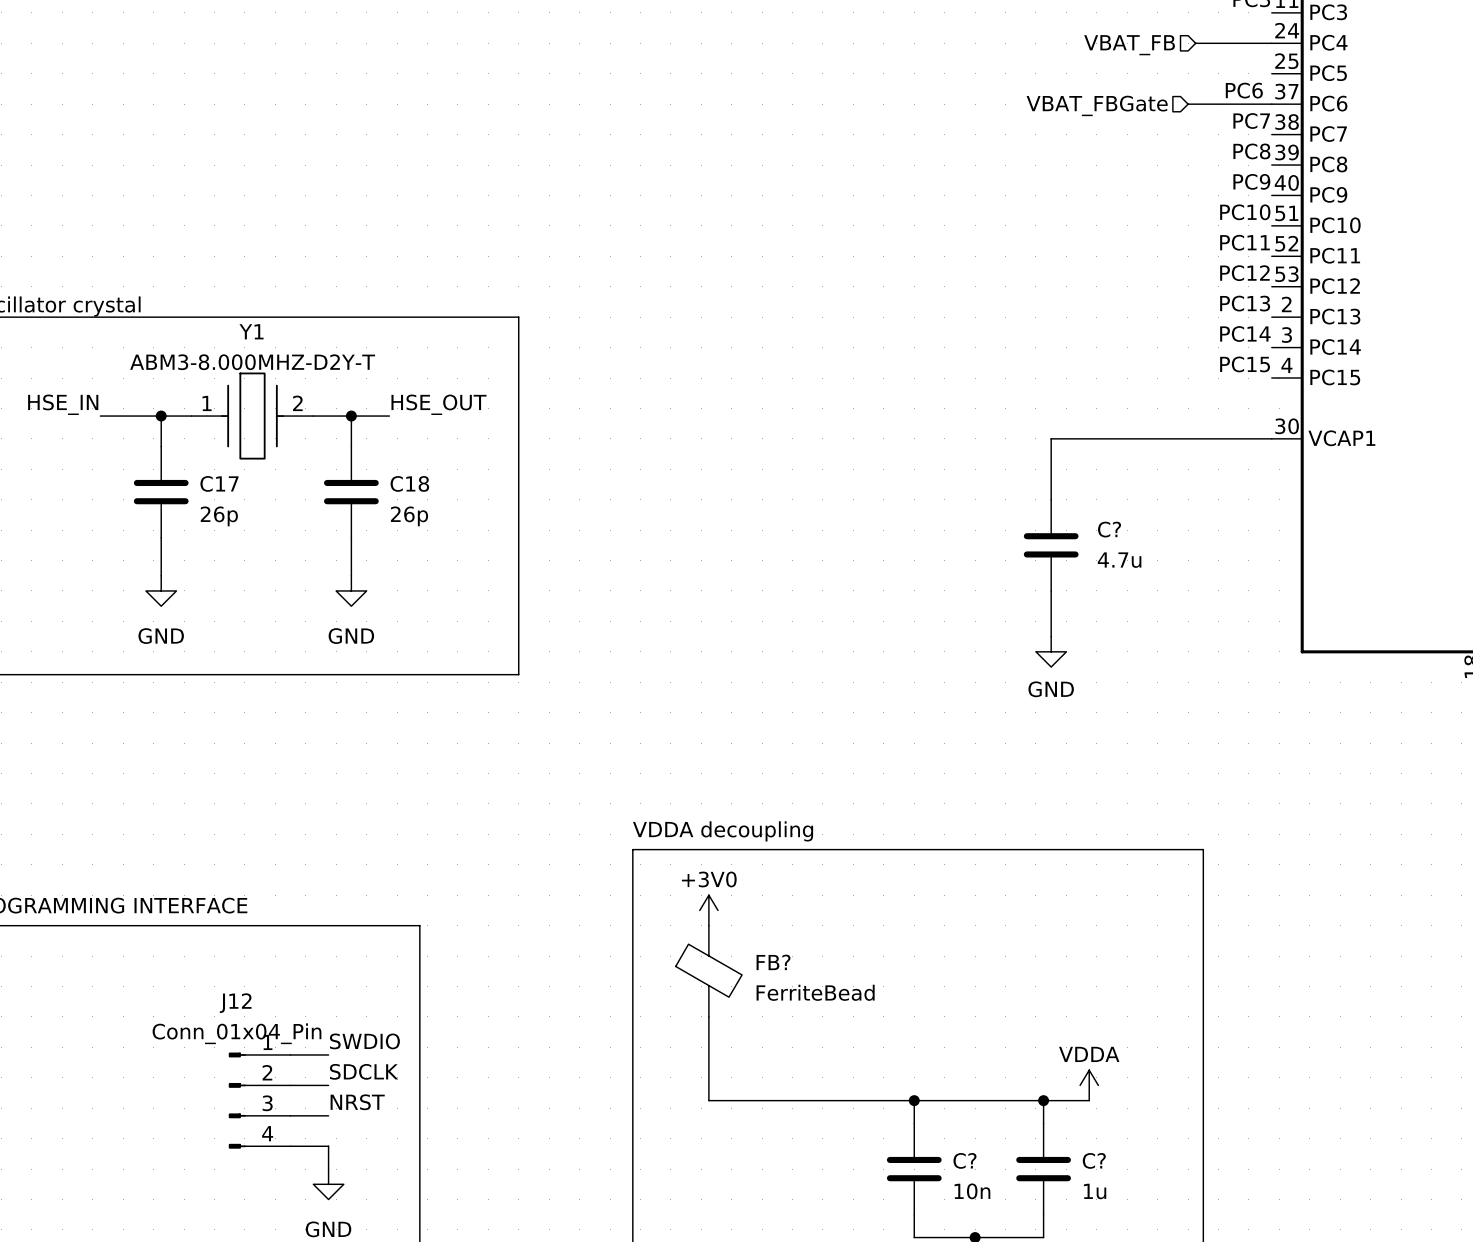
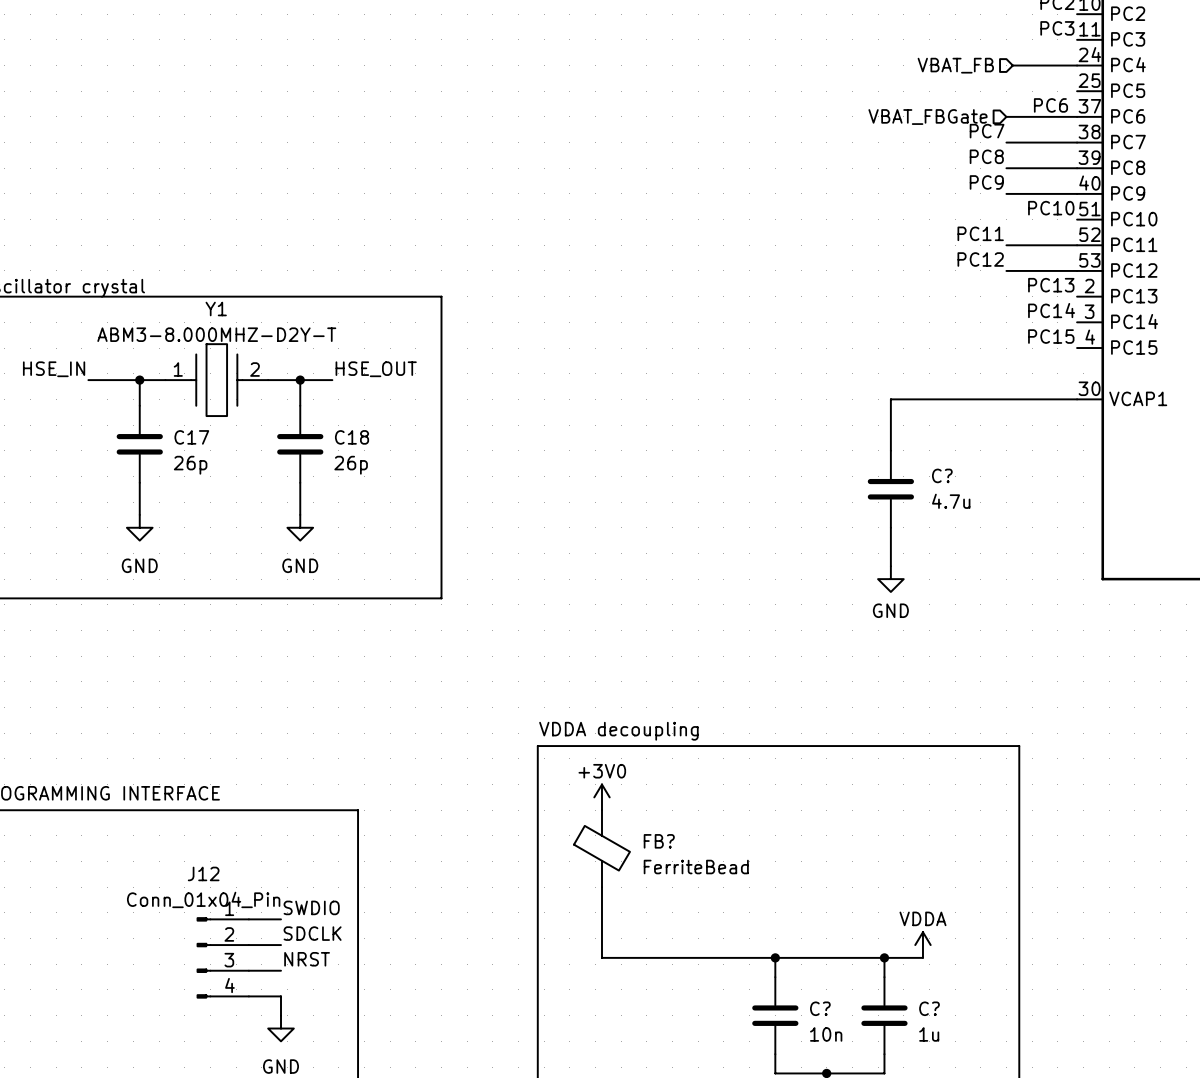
label position: PC7 (1251, 121) -> PC7 (987, 131)
wire: none -> (1006, 142) (1077, 142)
label position: PC8 (1251, 151) -> PC8 (986, 156)
wire: none -> (1006, 168) (1077, 168)
label position: PC9 (1251, 181) -> PC9 (986, 182)
wire: none -> (1006, 193) (1077, 193)
label position: PC11 (1244, 242) -> PC11 (980, 233)
wire: none -> (1006, 245) (1077, 245)
label position: PC12 (1244, 273) -> PC12 (980, 259)
wire: none -> (1006, 270) (1077, 270)

